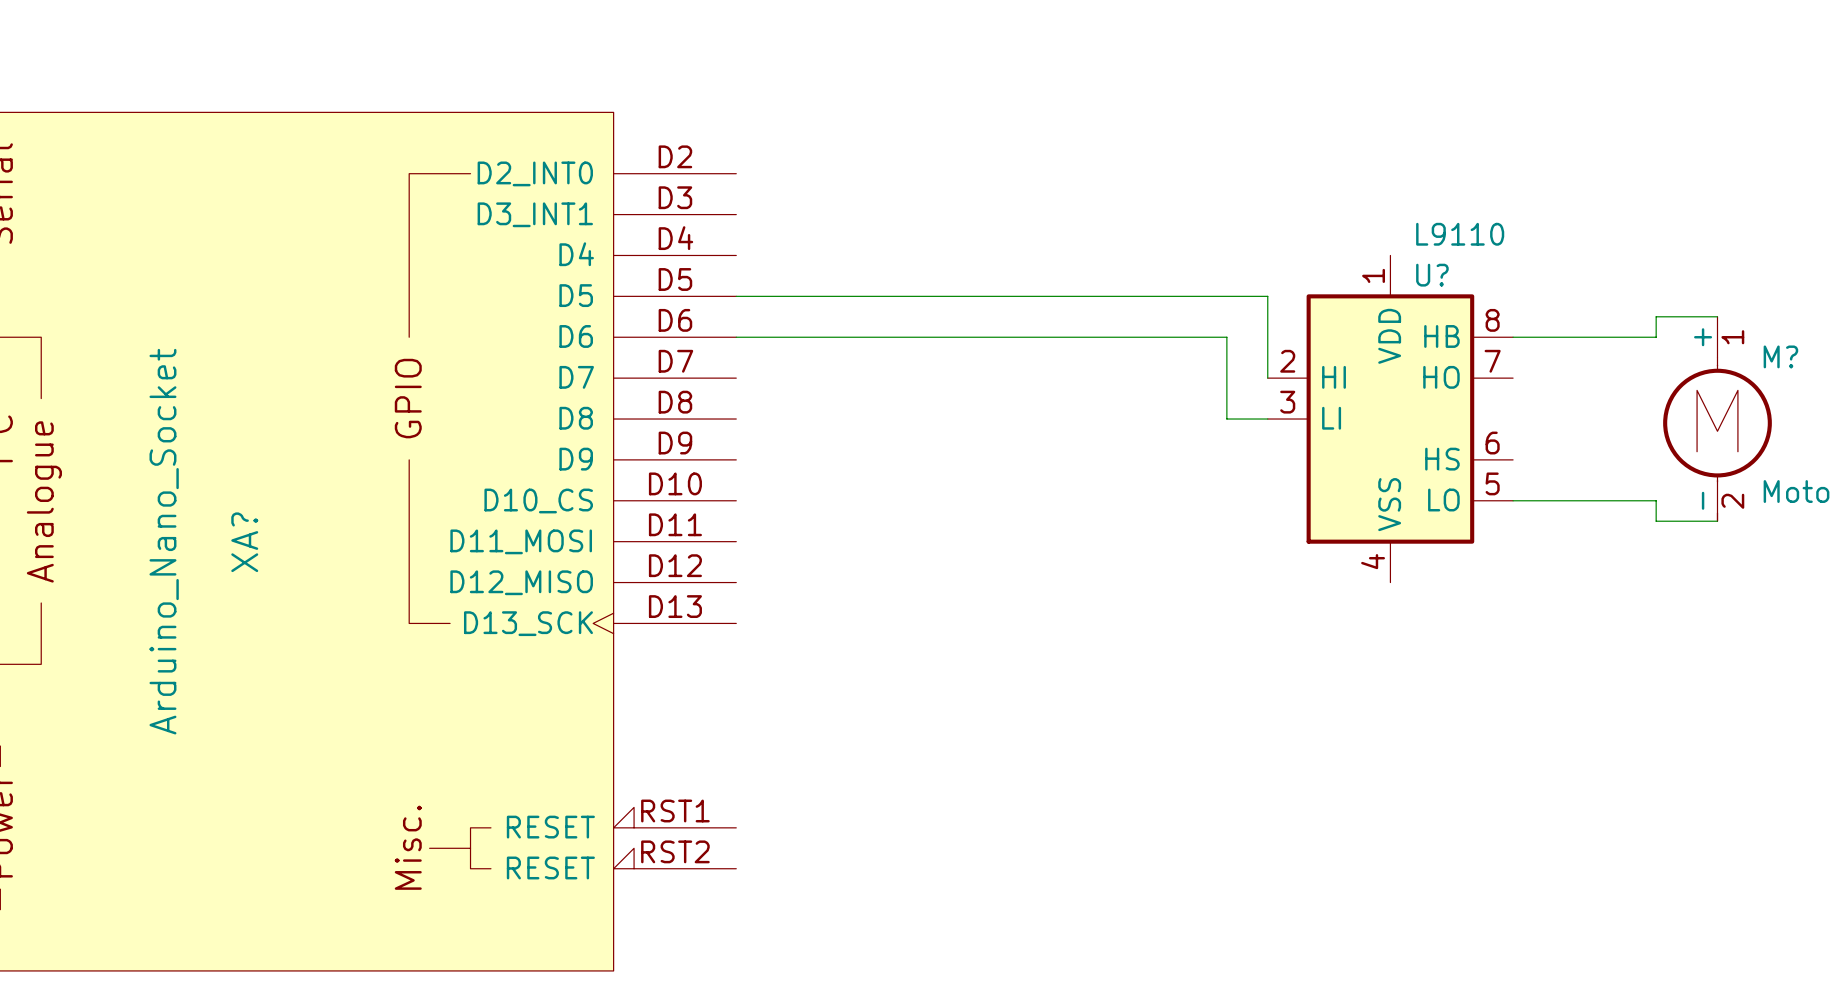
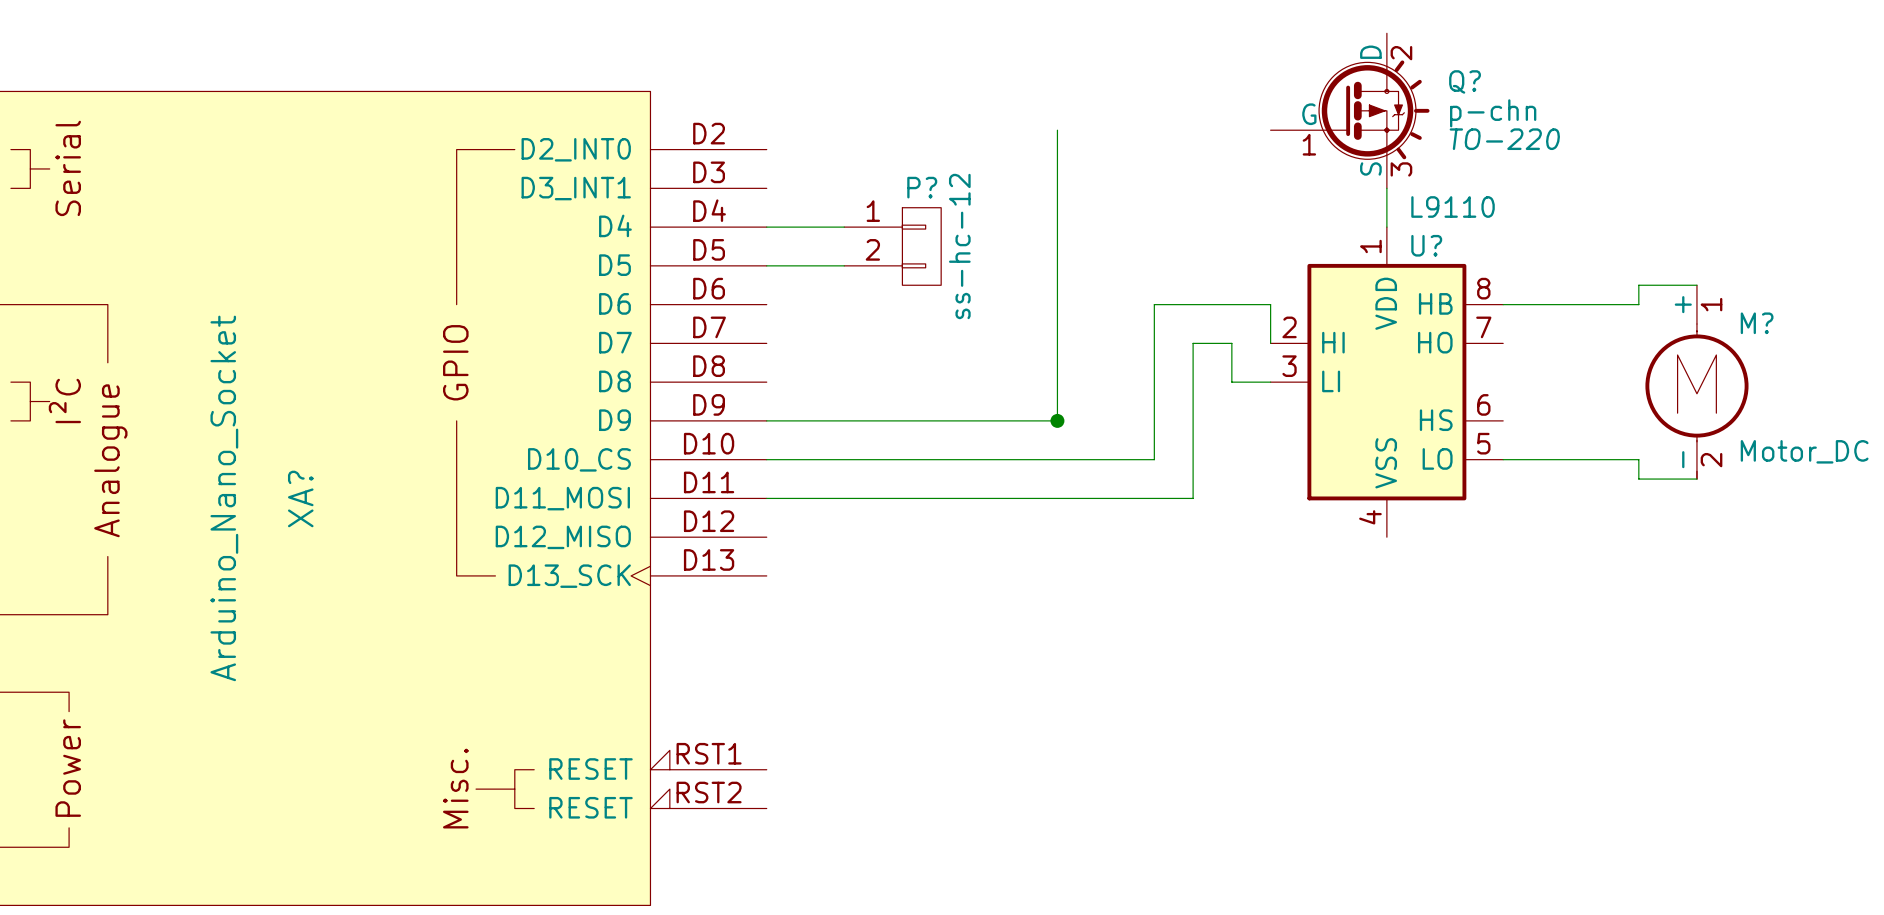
Q?: none -> p-chn (1350, 110)
wire: none -> (1057, 130) (1057, 420) (766, 420)
wire: none -> (1386, 188) (1386, 227)
wire: none -> (766, 227) (844, 227)
P?: none -> ss-hc-12 (892, 246)
wire: (818, 296) (1267, 296) (1267, 337) -> none
wire: (736, 337) (1145, 337) -> (766, 459) (1154, 459) (1154, 304)
wire: (1226, 337) (1226, 378) -> (1231, 304) (1270, 304)
wire: none -> (1231, 343) (1193, 343) (1193, 498) (766, 498)
junction: none -> (1057, 420)

